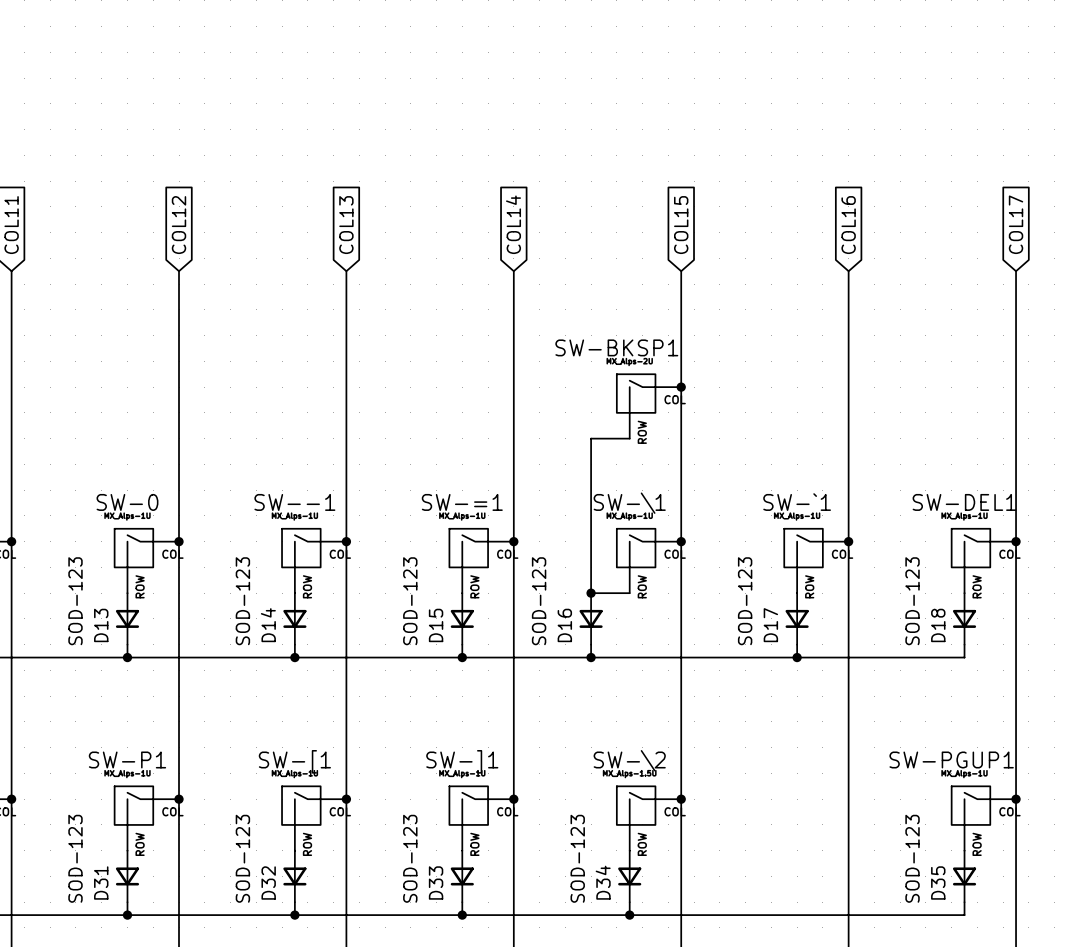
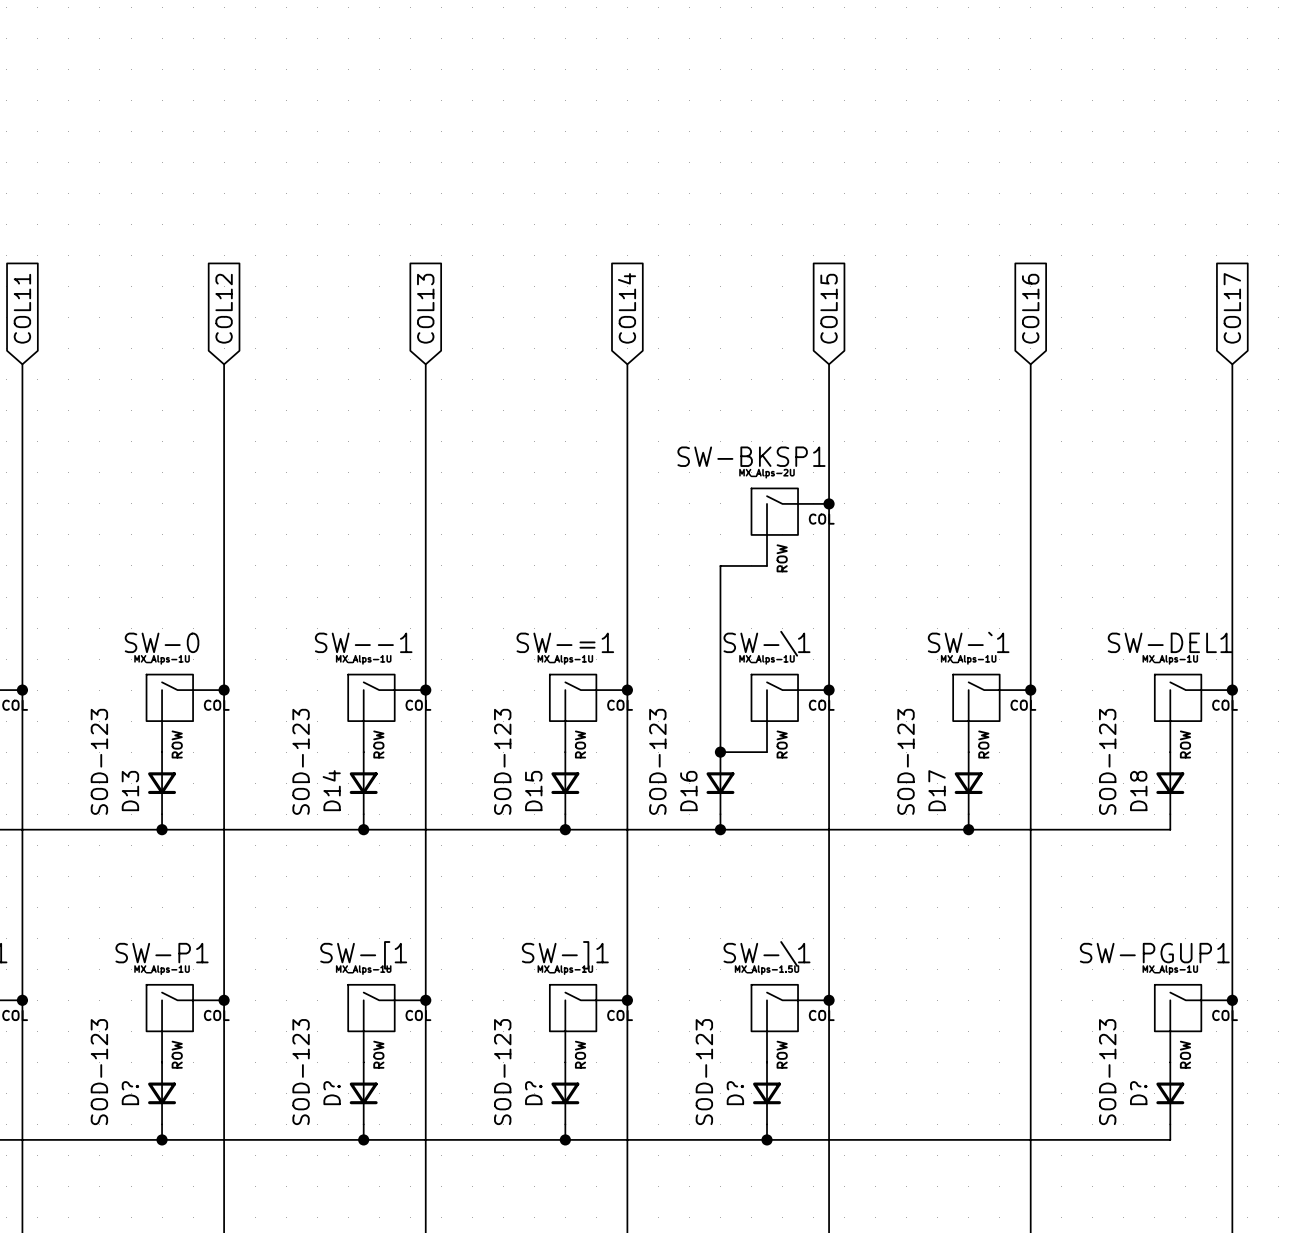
SW-\2 name: SW-\2 (629, 760) -> SW-\1 (767, 953)
D31 name: D31 (101, 882) -> D? (130, 1093)
D32 name: D32 (268, 882) -> D? (332, 1093)
D33 name: D33 (436, 882) -> D? (533, 1093)
D34 name: D34 (603, 882) -> D? (735, 1093)
D35 name: D35 (938, 882) -> D? (1138, 1093)

